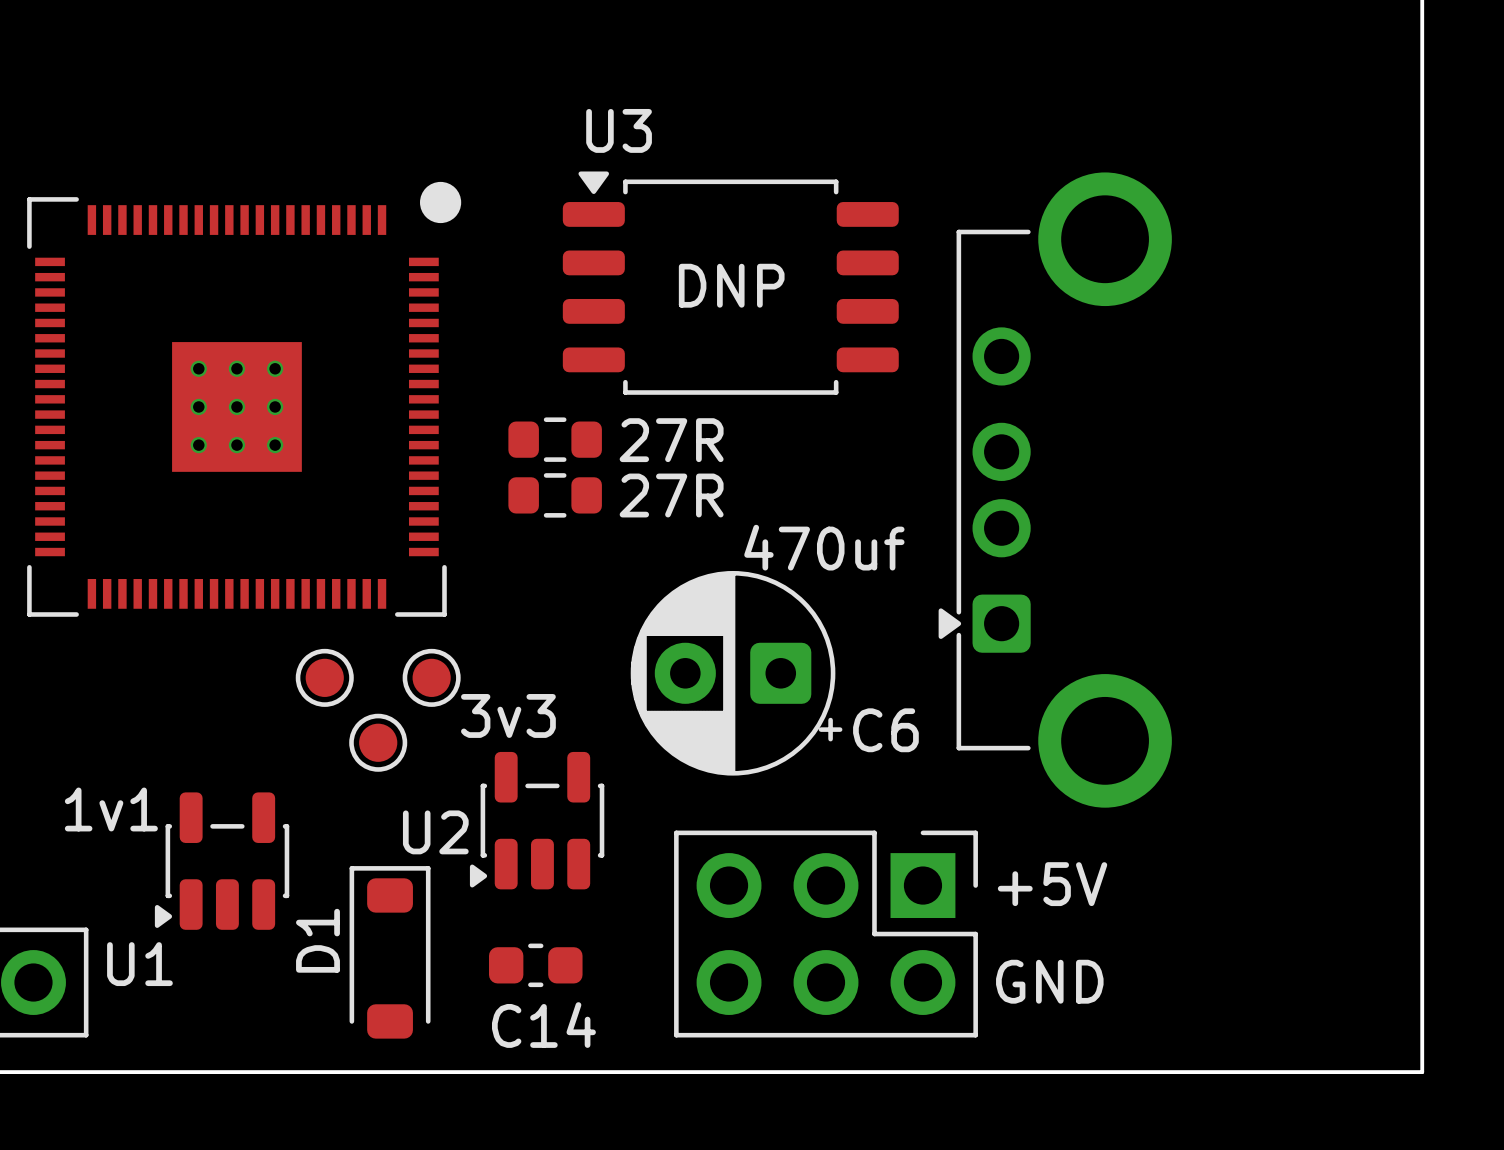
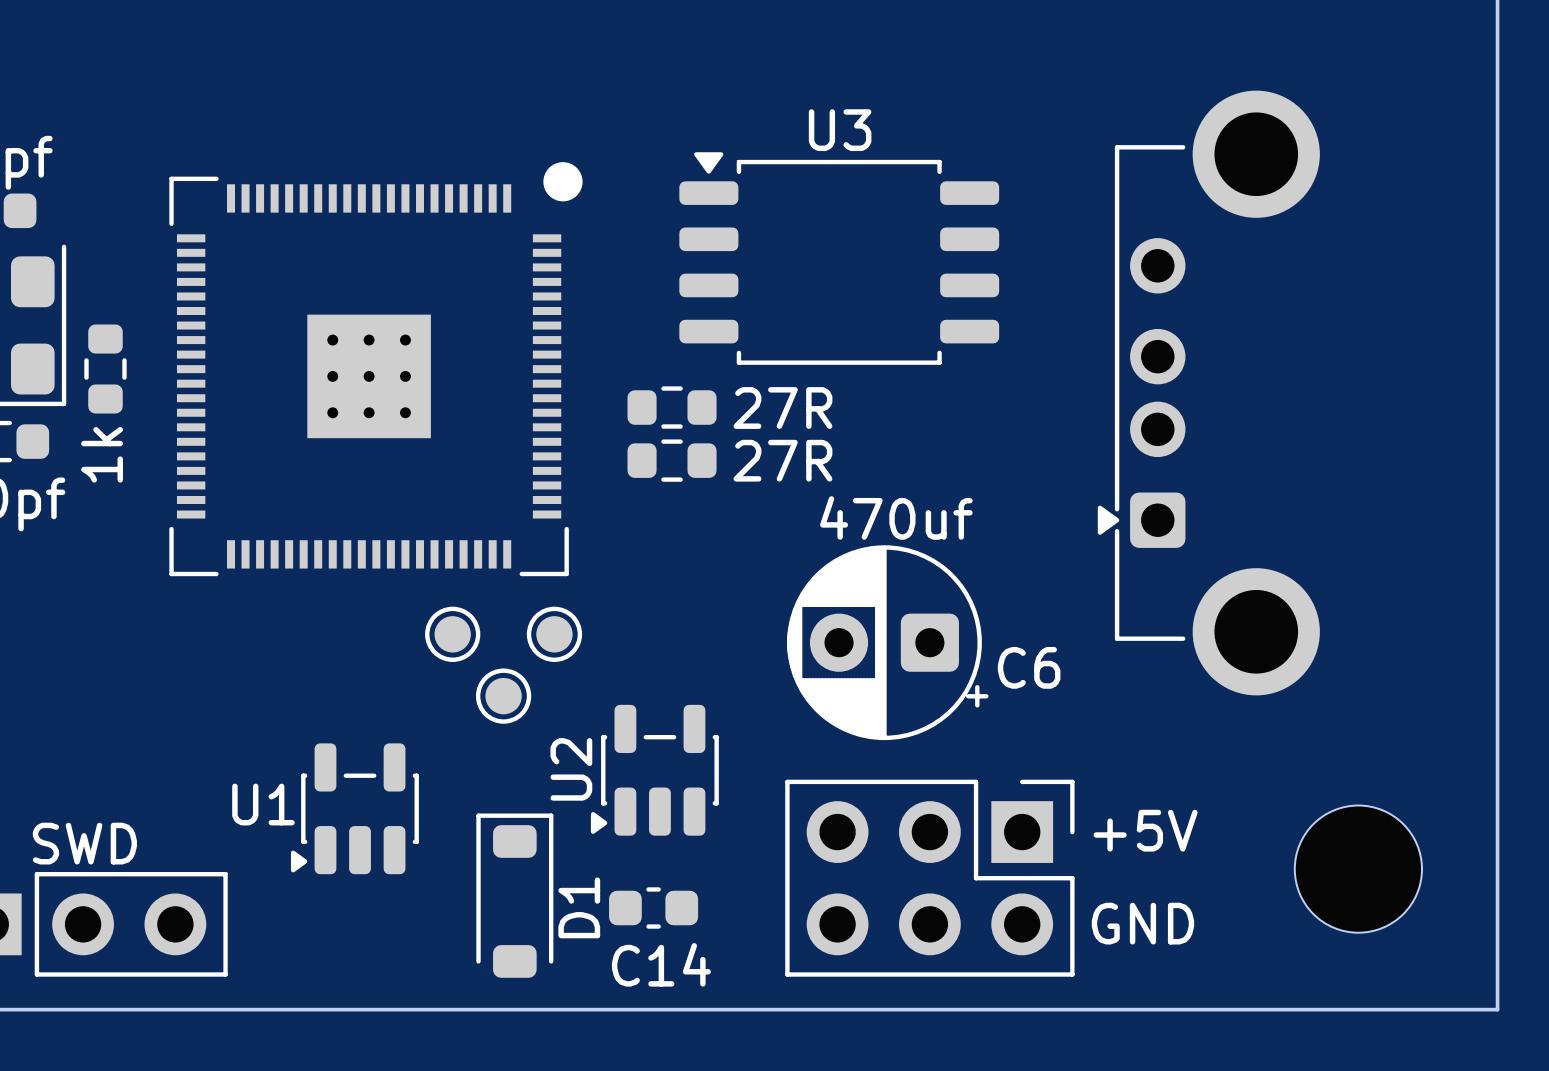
U3 name position: U3 (619, 130) -> U3 (840, 130)
U3 text: DNP (731, 285) -> none
part position: (1055, 490) -> (1208, 393)
C6 value position: 470uf (824, 547) -> 470uf (896, 517)
C6 position: (736, 673) -> (887, 642)
U2 text: 3v3 (508, 715) -> none
C6 name position: C6 (885, 730) -> C6 (1029, 667)
U1 text: 1v1 (111, 809) -> none
U2 name rotation: 0° (435, 832) -> 90° counterclockwise (571, 769)
part: none -> (1358, 869)
D1 name position: D1 (317, 940) -> D1 (579, 907)
U1 name position: U1 (139, 964) -> U1 (263, 804)

